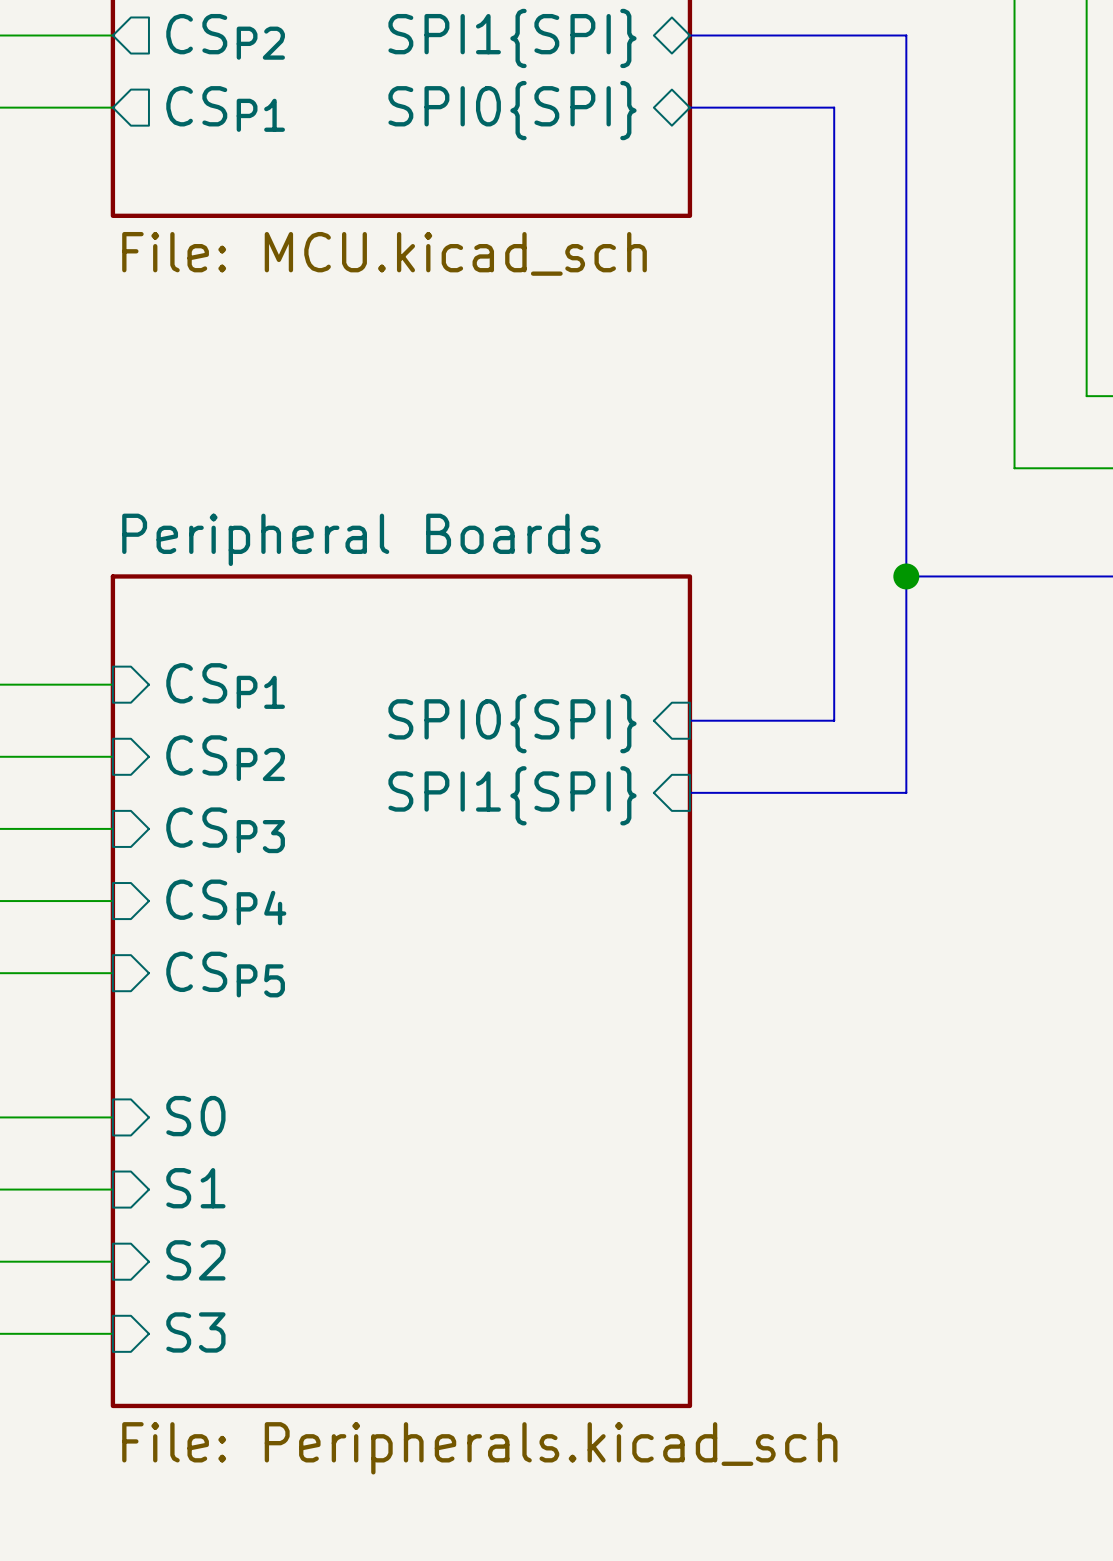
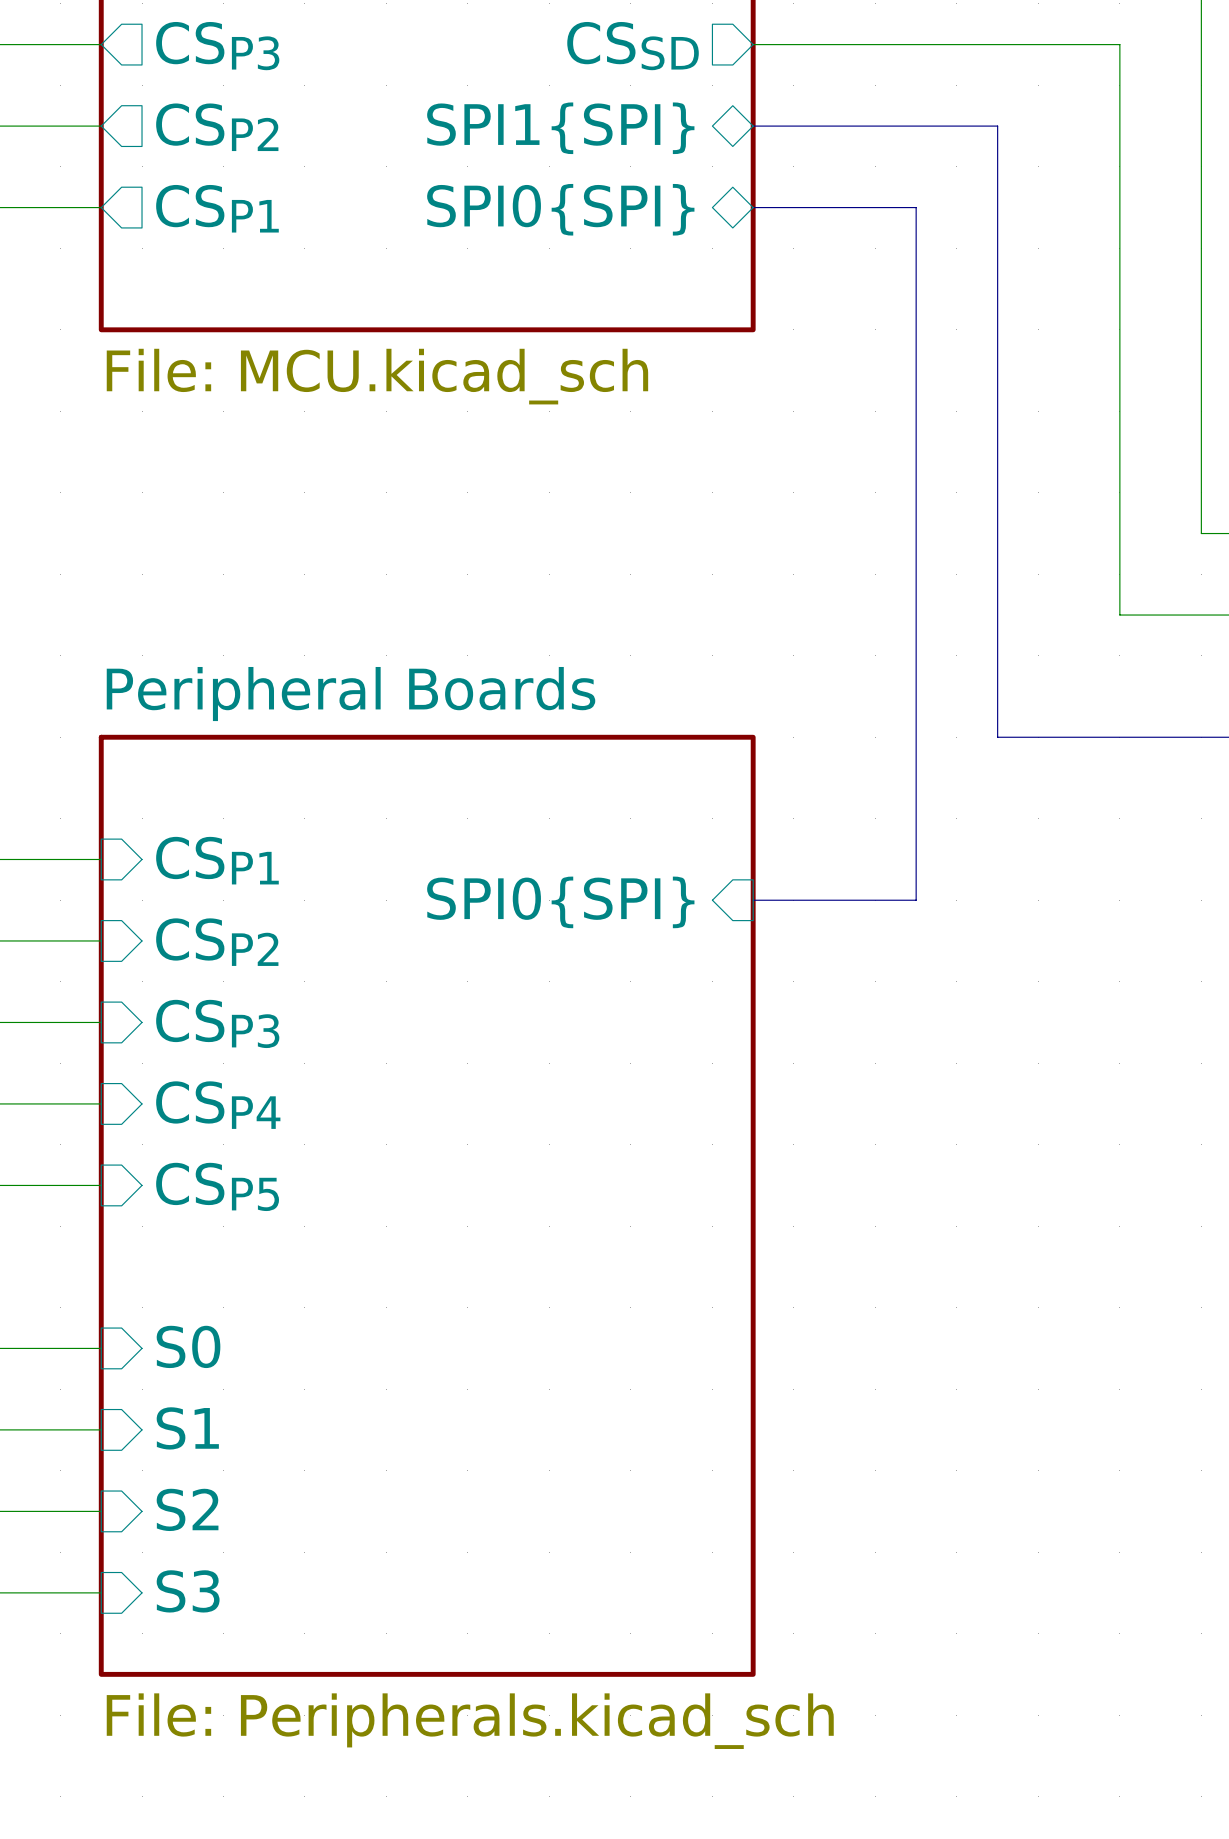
bus: (906, 576) (906, 792) (689, 792) -> none
junction: (906, 576) -> none
sheet pin: SPI1{SPI} (512, 795) -> none

